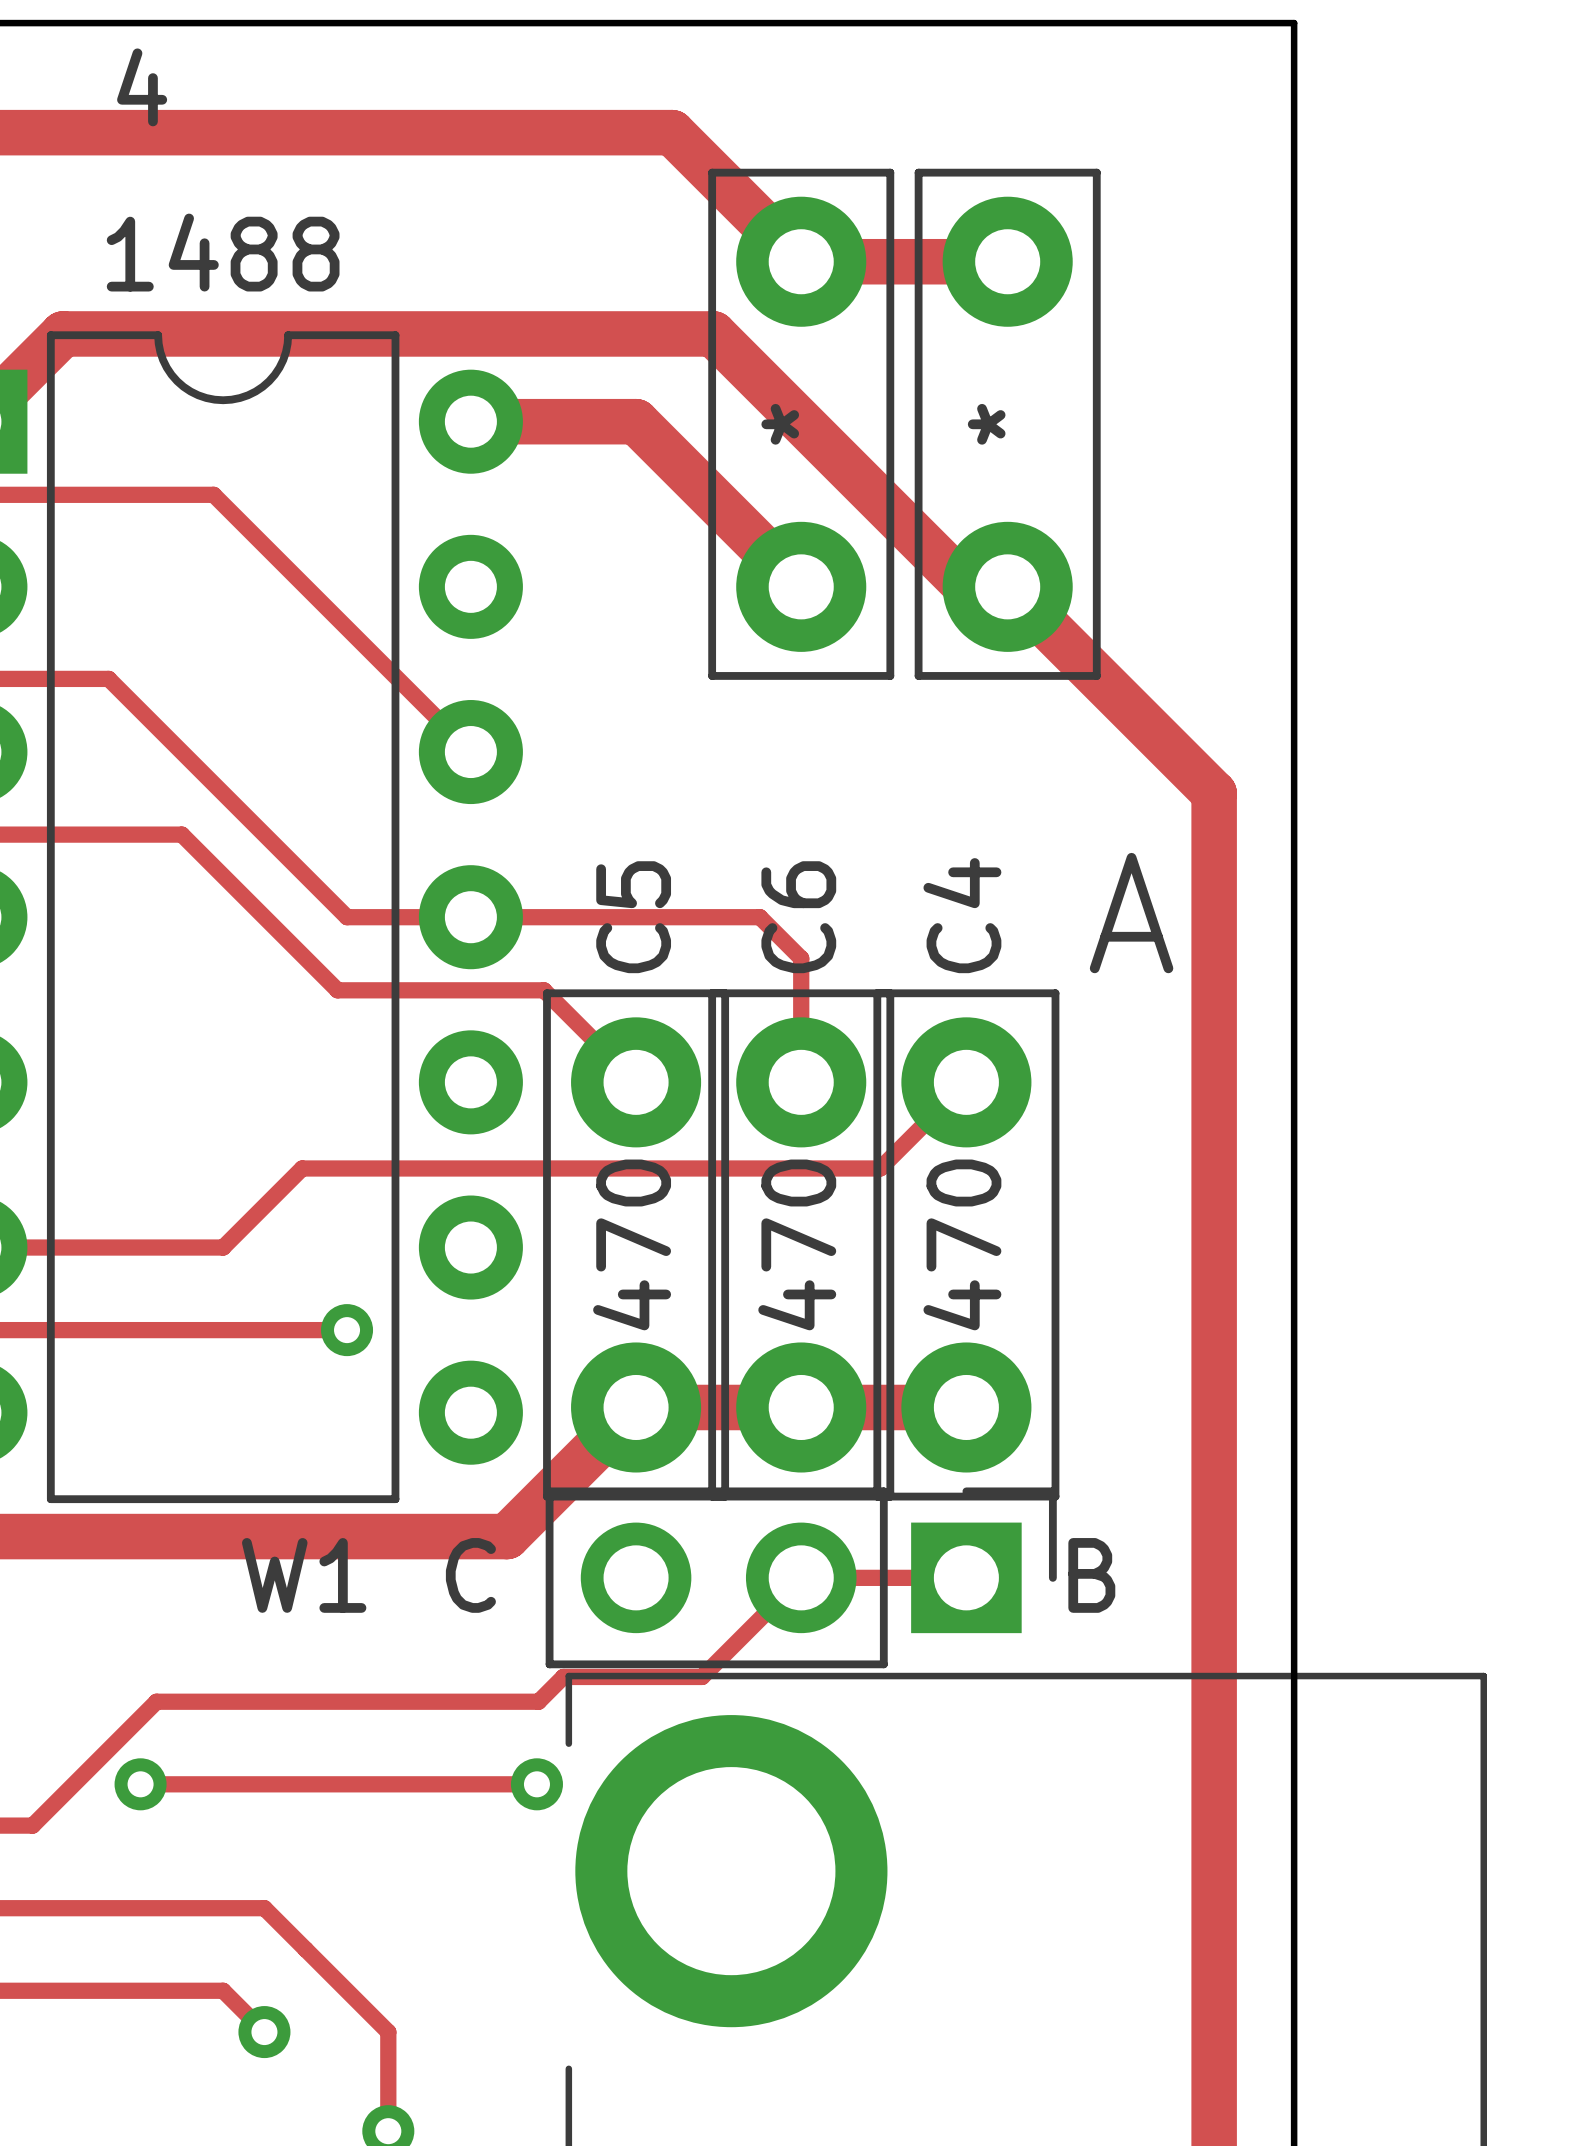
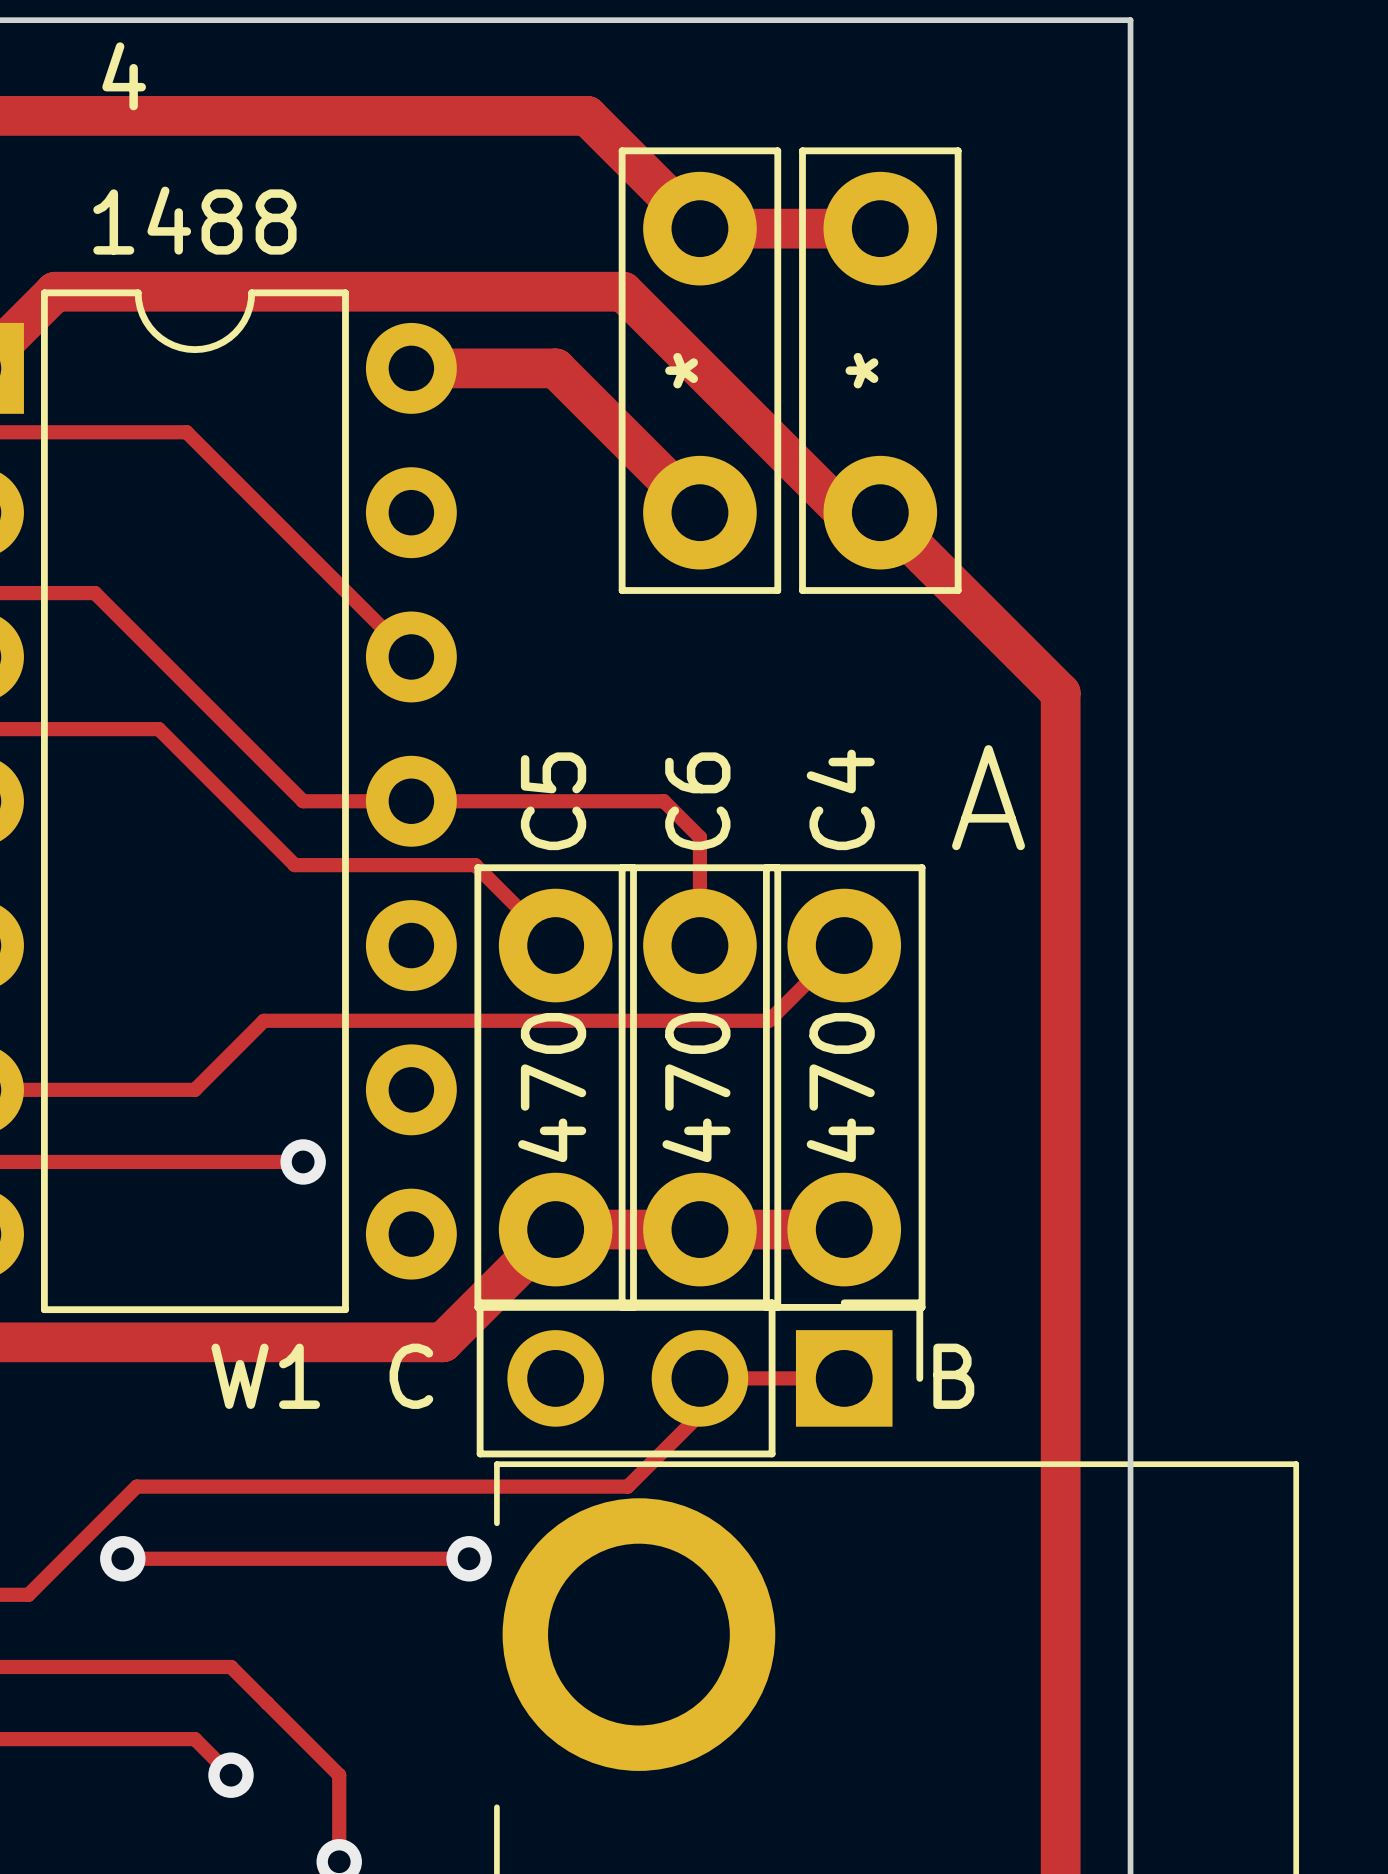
track: (801, 1577) (702, 1676) (563, 1676) (538, 1701) -> (699, 1414) (627, 1486) (470, 1486)

